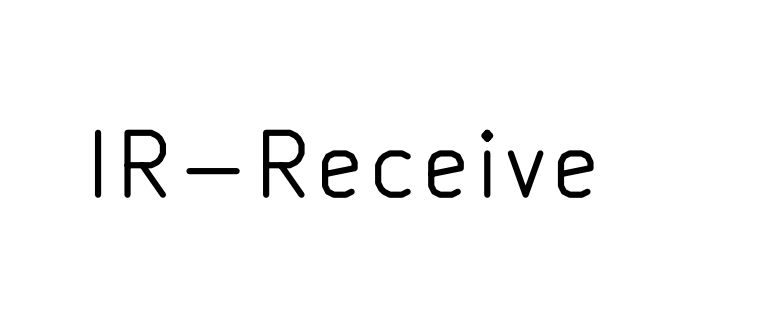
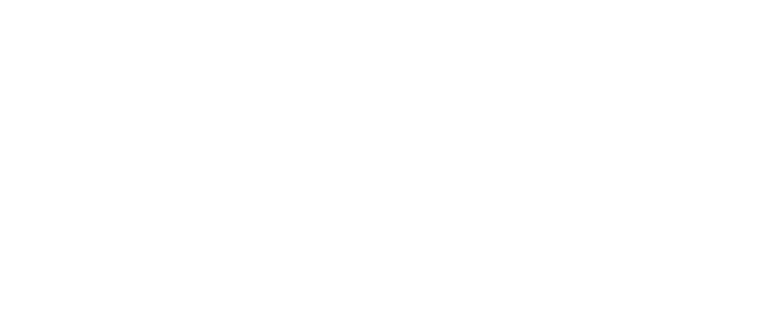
label: IR-Receive (344, 163) -> none

